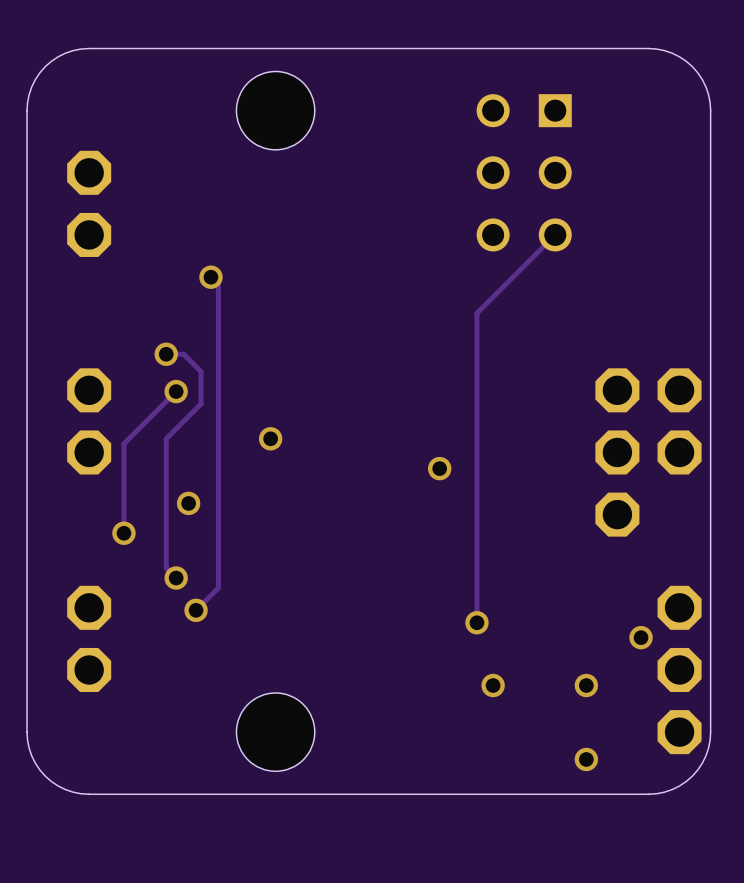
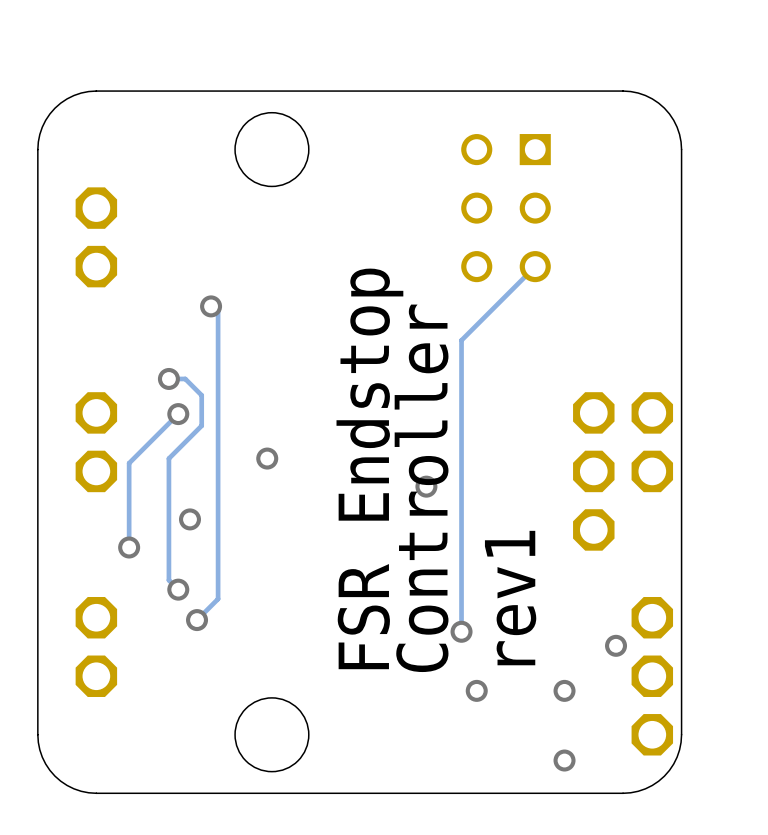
text: none -> FSR Endstop (369, 468)
text: none -> Controller (421, 488)
text: none -> rev1 (510, 598)

